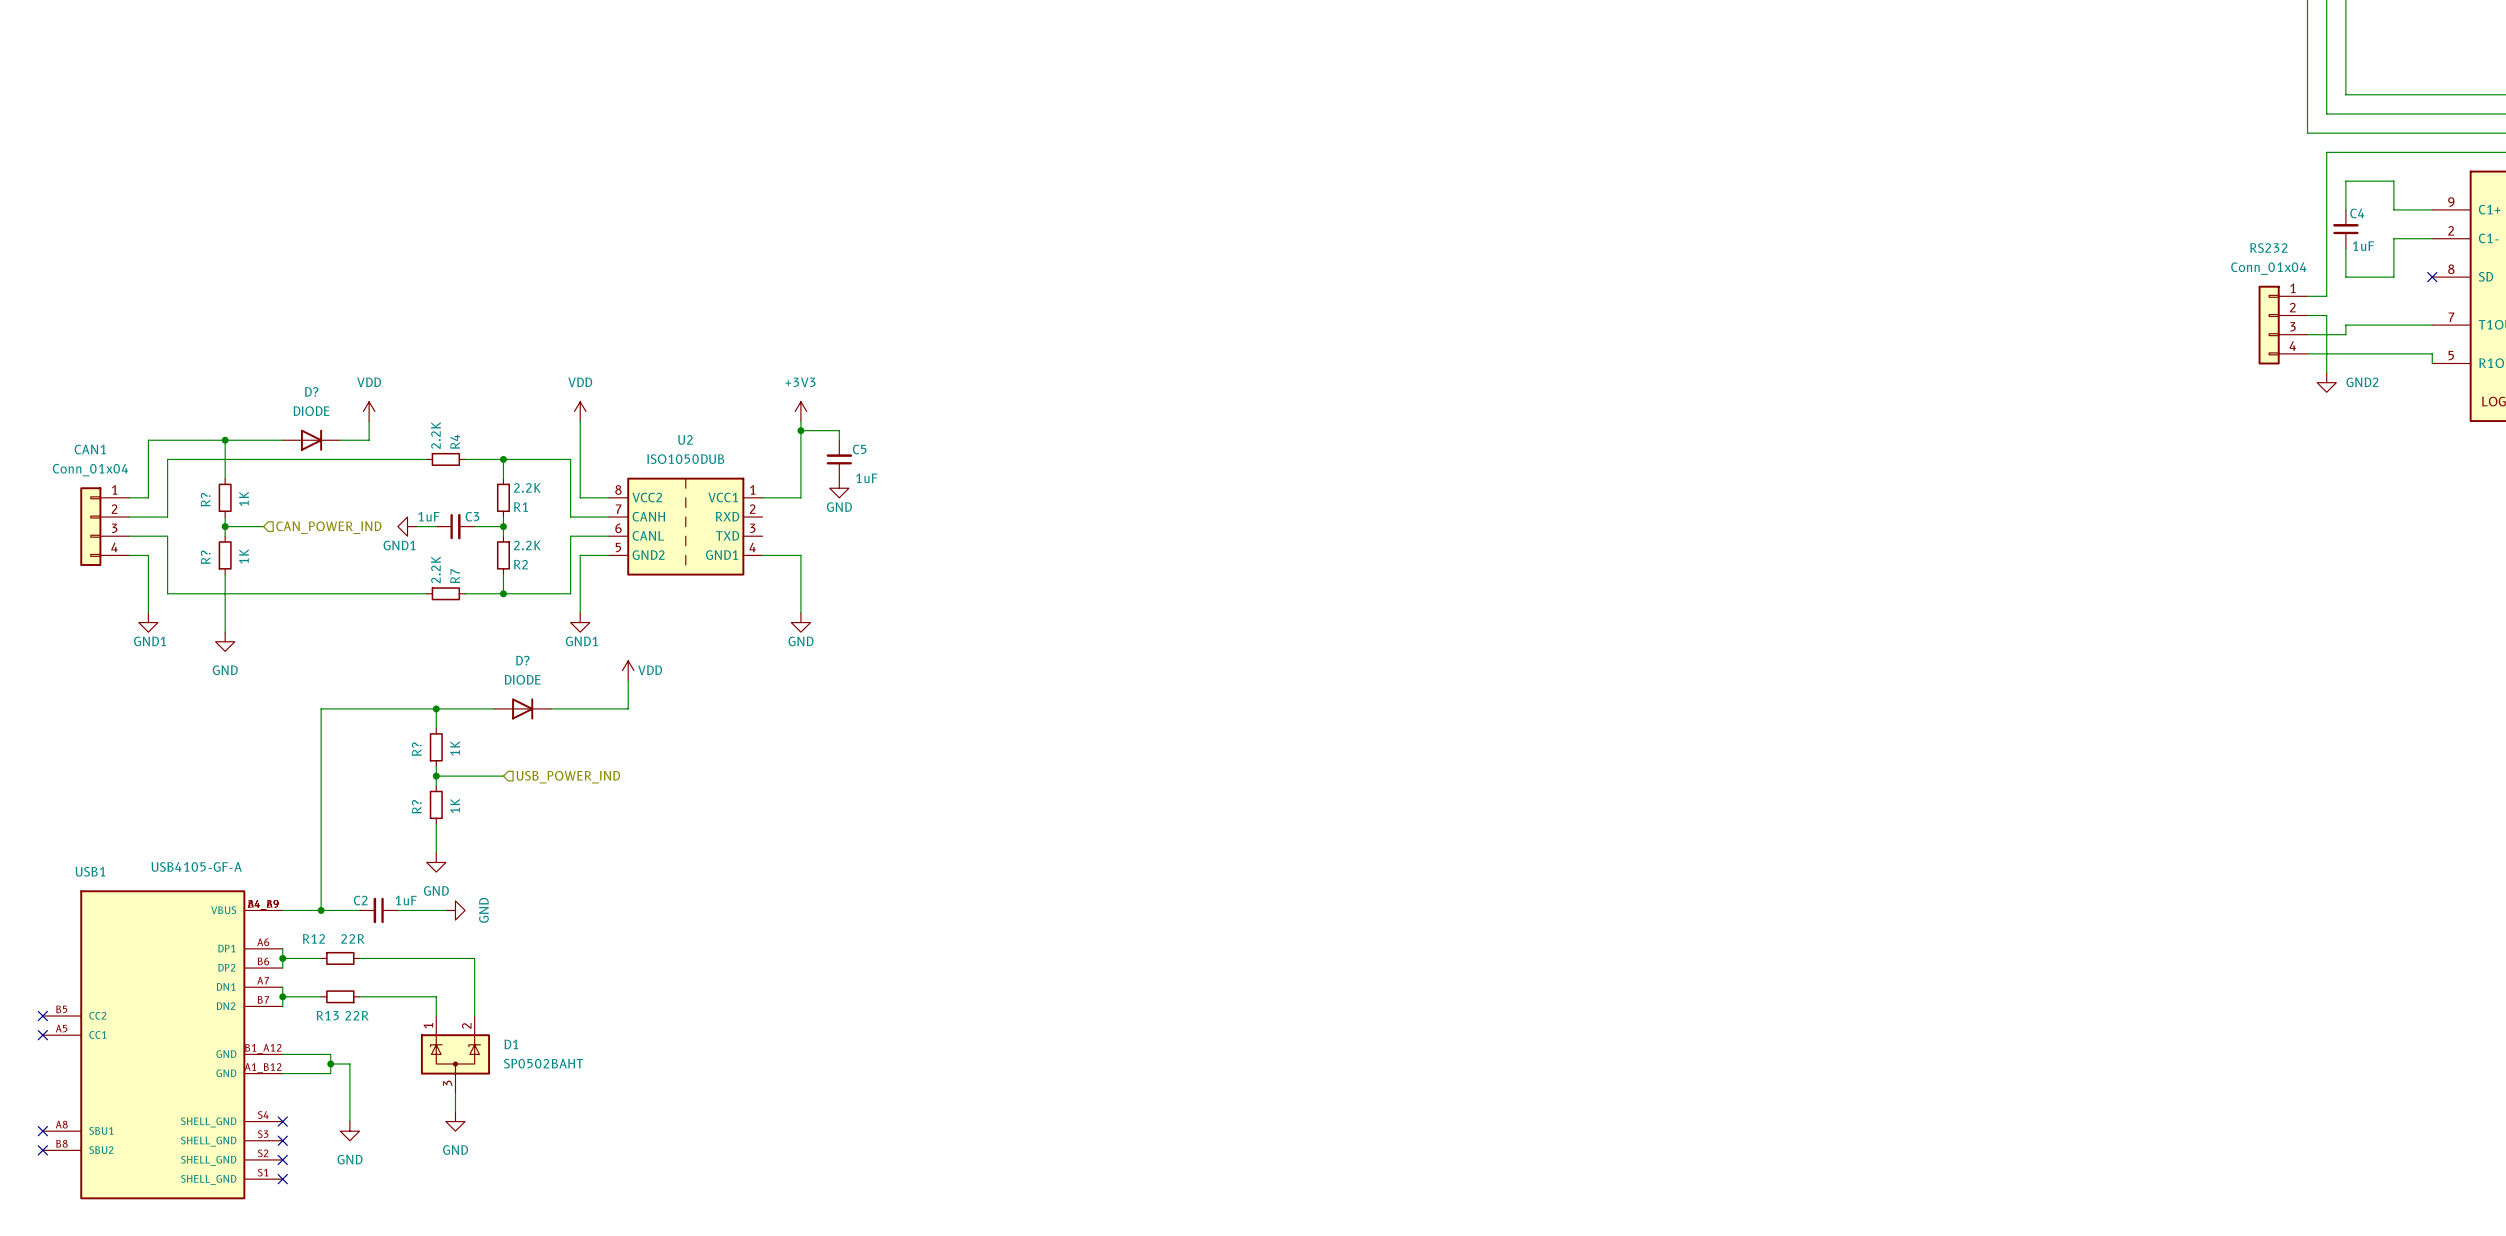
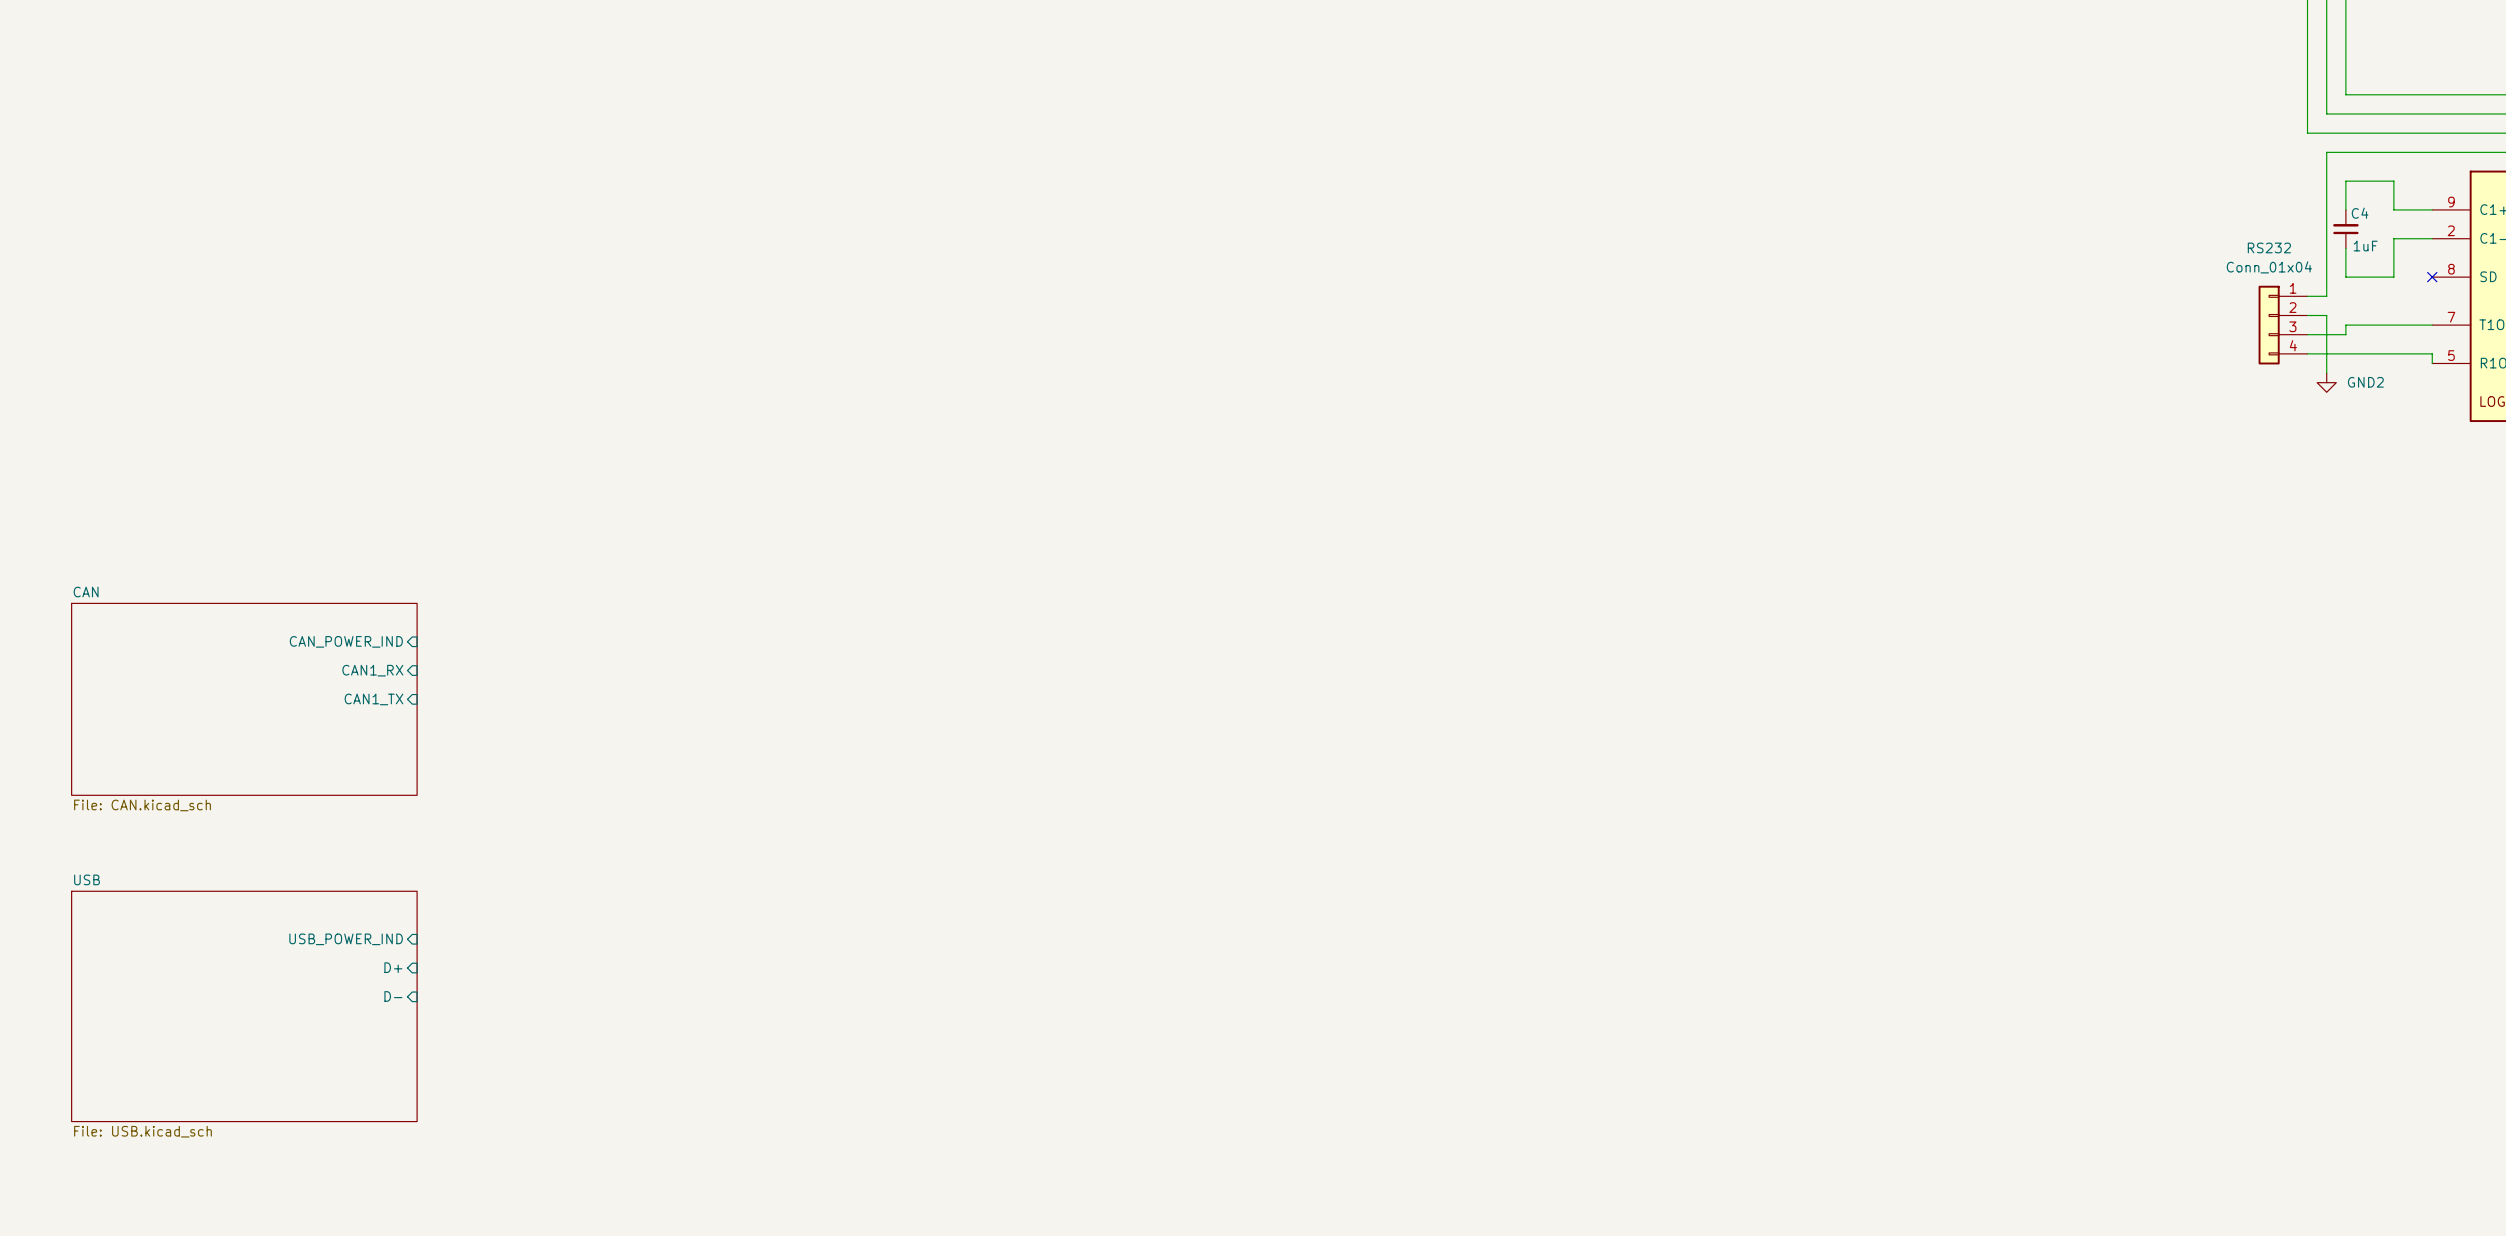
power symbol: VDD (369, 411) -> none
power symbol: VDD (580, 411) -> none
power symbol: +3V3 (800, 411) -> none
wire: (369, 421) (369, 440) (340, 440) -> none
wire: (580, 421) (580, 497) (609, 497) -> none
wire: (800, 421) (800, 497) (762, 497) -> none
wire: (800, 430) (839, 430) (839, 440) -> none
junction: (800, 430) -> none
wire: (225, 440) (225, 478) -> none
junction: (225, 440) -> none
wire: (282, 440) (148, 440) (148, 497) (129, 497) -> none
D?: DIODE (311, 440) -> none
wire: (426, 459) (167, 459) (167, 517) (129, 517) -> none
R4: 2.2K (445, 459) -> none
wire: (465, 459) (570, 459) (570, 517) (609, 517) -> none
wire: (503, 459) (503, 478) -> none
junction: (503, 459) -> none
C5: 1uF (839, 459) -> none
power symbol: GND (839, 488) -> none
R?: 1K (225, 497) -> none
R1: 2.2K (503, 497) -> none
wire: (225, 517) (225, 536) -> none
wire: (503, 517) (503, 536) -> none
CAN1: Conn_01x04 (104, 526) -> none
wire: (225, 526) (263, 526) -> none
junction: (225, 526) -> none
power symbol: GND1 (407, 526) -> none
wire: (417, 526) (436, 526) -> none
C3: 1uF (455, 526) -> none
wire: (474, 526) (503, 526) -> none
junction: (503, 526) -> none
U2: ISO1050DUB (685, 526) -> none
hierarchical label: CAN_POWER_IND (328, 527) -> none
wire: (129, 536) (167, 536) (167, 593) (426, 593) -> none
wire: (609, 536) (570, 536) (570, 593) (465, 593) -> none
wire: (129, 555) (148, 555) (148, 612) -> none
R?: 1K (225, 555) -> none
R2: 2.2K (503, 555) -> none
wire: (609, 555) (580, 555) (580, 612) -> none
wire: (762, 555) (800, 555) (800, 612) -> none
wire: (225, 574) (225, 632) -> none
wire: (503, 574) (503, 593) -> none
R7: 2.2K (445, 593) -> none
junction: (503, 593) -> none
power symbol: GND1 (148, 622) -> none
power symbol: GND1 (580, 622) -> none
power symbol: GND (800, 622) -> none
power symbol: GND (225, 641) -> none
sheet pin: none -> CAN_POWER_IND (346, 641)
power symbol: VDD (628, 670) -> none
sheet pin: none -> CAN1_RX (372, 670)
wire: (628, 680) (628, 708) (551, 708) -> none
sheet CAN: none -> File: CAN.kicad_sch (244, 699)
sheet pin: none -> CAN1_TX (373, 699)
wire: (436, 708) (436, 728) -> none
junction: (436, 708) -> none
wire: (493, 708) (321, 708) (321, 910) -> none
D?: DIODE (522, 708) -> none
R?: 1K (436, 747) -> none
wire: (436, 766) (436, 785) -> none
wire: (436, 776) (503, 776) -> none
junction: (436, 776) -> none
hierarchical label: USB_POWER_IND (568, 777) -> none
R?: 1K (436, 804) -> none
wire: (436, 824) (436, 852) -> none
power symbol: GND (436, 862) -> none
wire: (282, 910) (359, 910) -> none
junction: (321, 910) -> none
C2: 1uF (378, 910) -> none
wire: (397, 910) (445, 910) -> none
power symbol: GND (455, 910) -> none
sheet pin: none -> USB_POWER_IND (346, 939)
wire: (282, 948) (282, 968) -> none
wire: (282, 958) (321, 958) -> none
junction: (282, 958) -> none
R12: 22R (340, 958) -> none
wire: (359, 958) (474, 958) (474, 1016) -> none
sheet pin: none -> D+ (393, 967)
wire: (282, 987) (282, 1006) -> none
wire: (282, 996) (321, 996) -> none
junction: (282, 996) -> none
R13: 22R (340, 996) -> none
wire: (359, 996) (436, 996) (436, 1016) -> none
sheet pin: none -> D- (393, 996)
sheet USB: none -> File: USB.kicad_sch (244, 1006)
no-connect mark: (42, 1016) -> none
no-connect mark: (42, 1035) -> none
USB1: USB4105-GF-A (162, 1044) -> none
wire: (282, 1054) (330, 1054) (330, 1073) (282, 1073) -> none
D1: SP0502BAHT (455, 1054) -> none
wire: (330, 1063) (349, 1063) (349, 1121) -> none
junction: (330, 1063) -> none
wire: (455, 1092) (455, 1111) -> none
no-connect mark: (282, 1121) -> none
power symbol: GND (455, 1121) -> none
no-connect mark: (42, 1131) -> none
power symbol: GND (349, 1131) -> none
no-connect mark: (282, 1140) -> none
no-connect mark: (42, 1150) -> none
no-connect mark: (282, 1159) -> none
no-connect mark: (282, 1179) -> none

